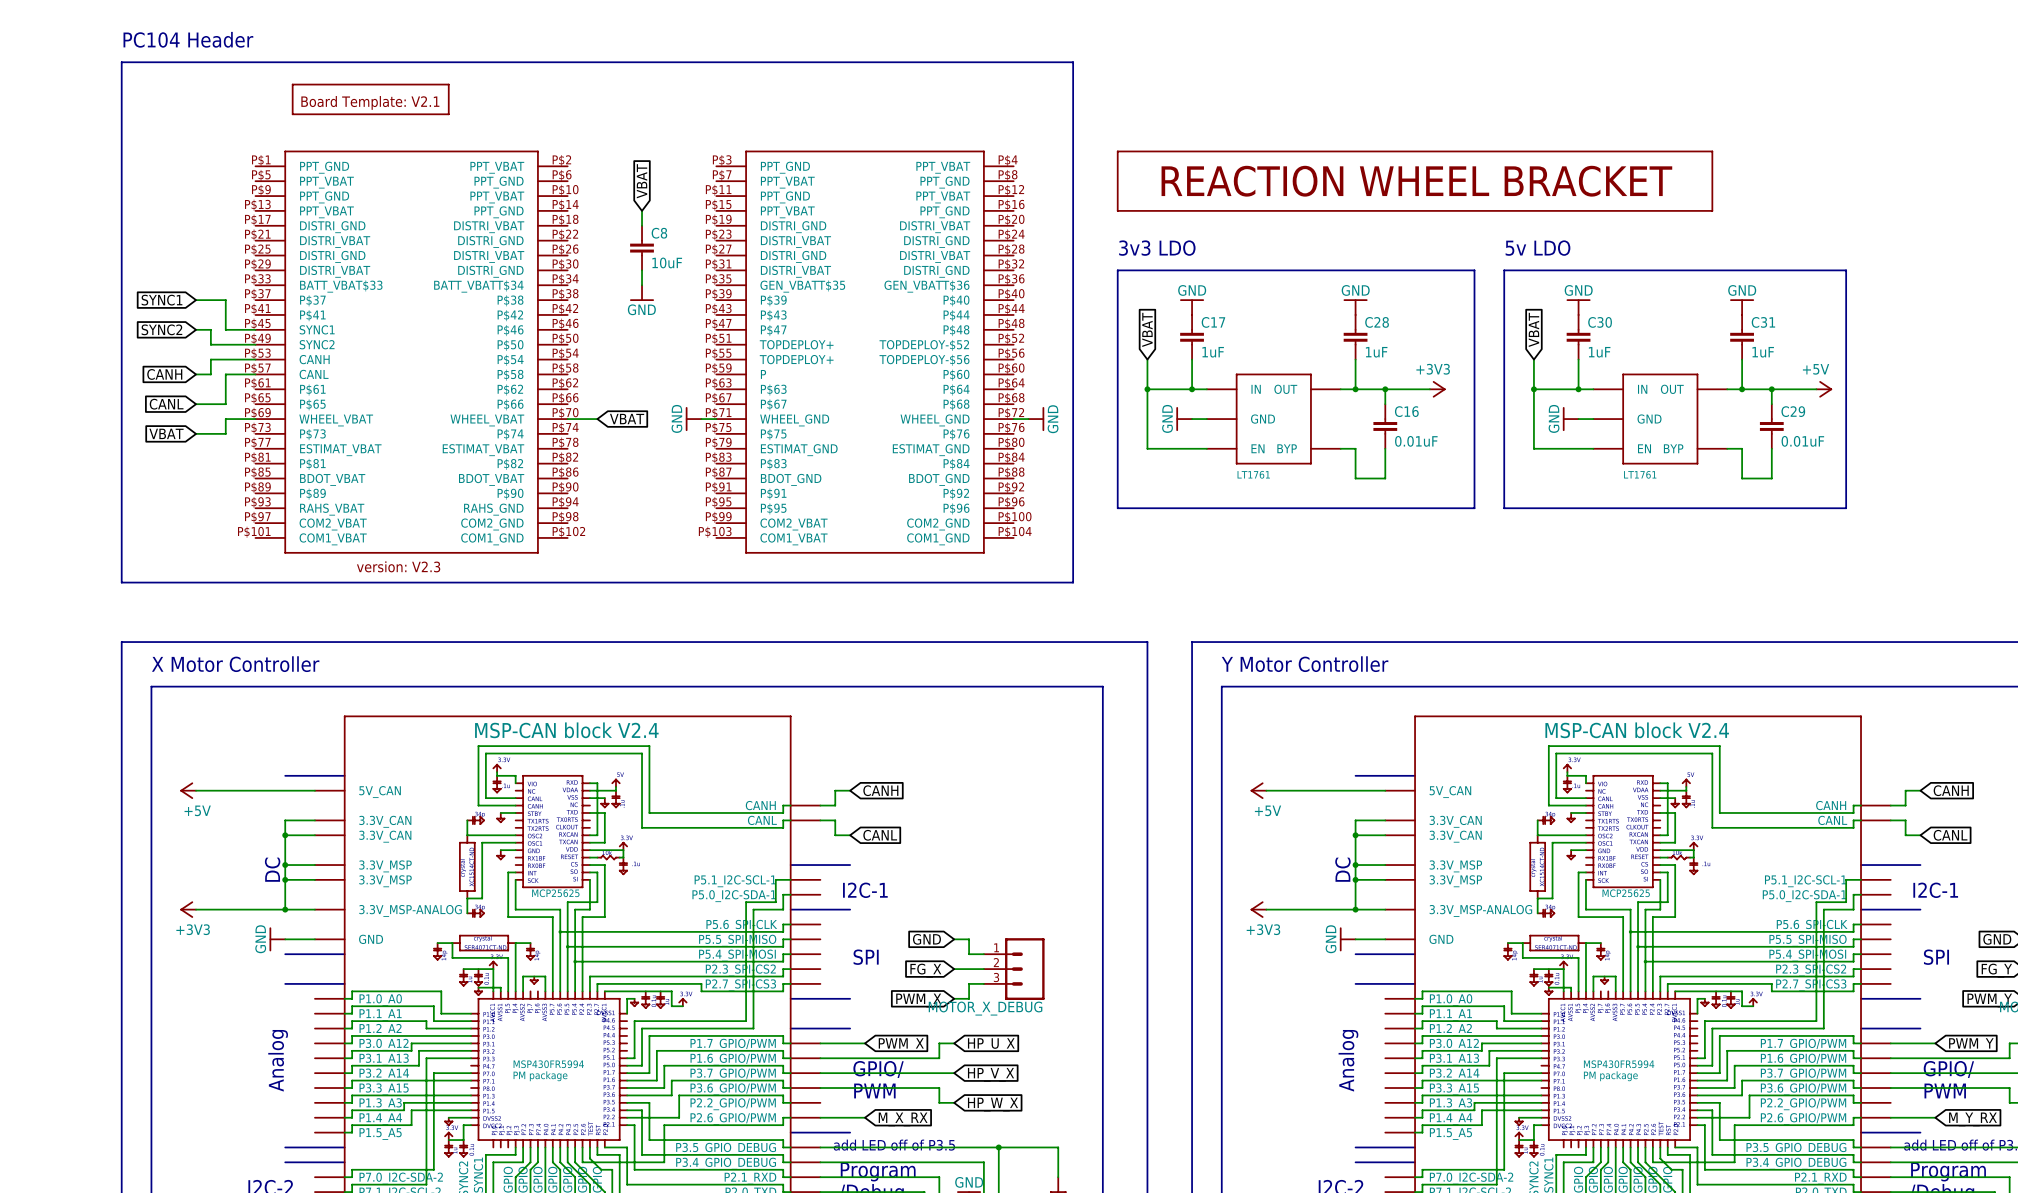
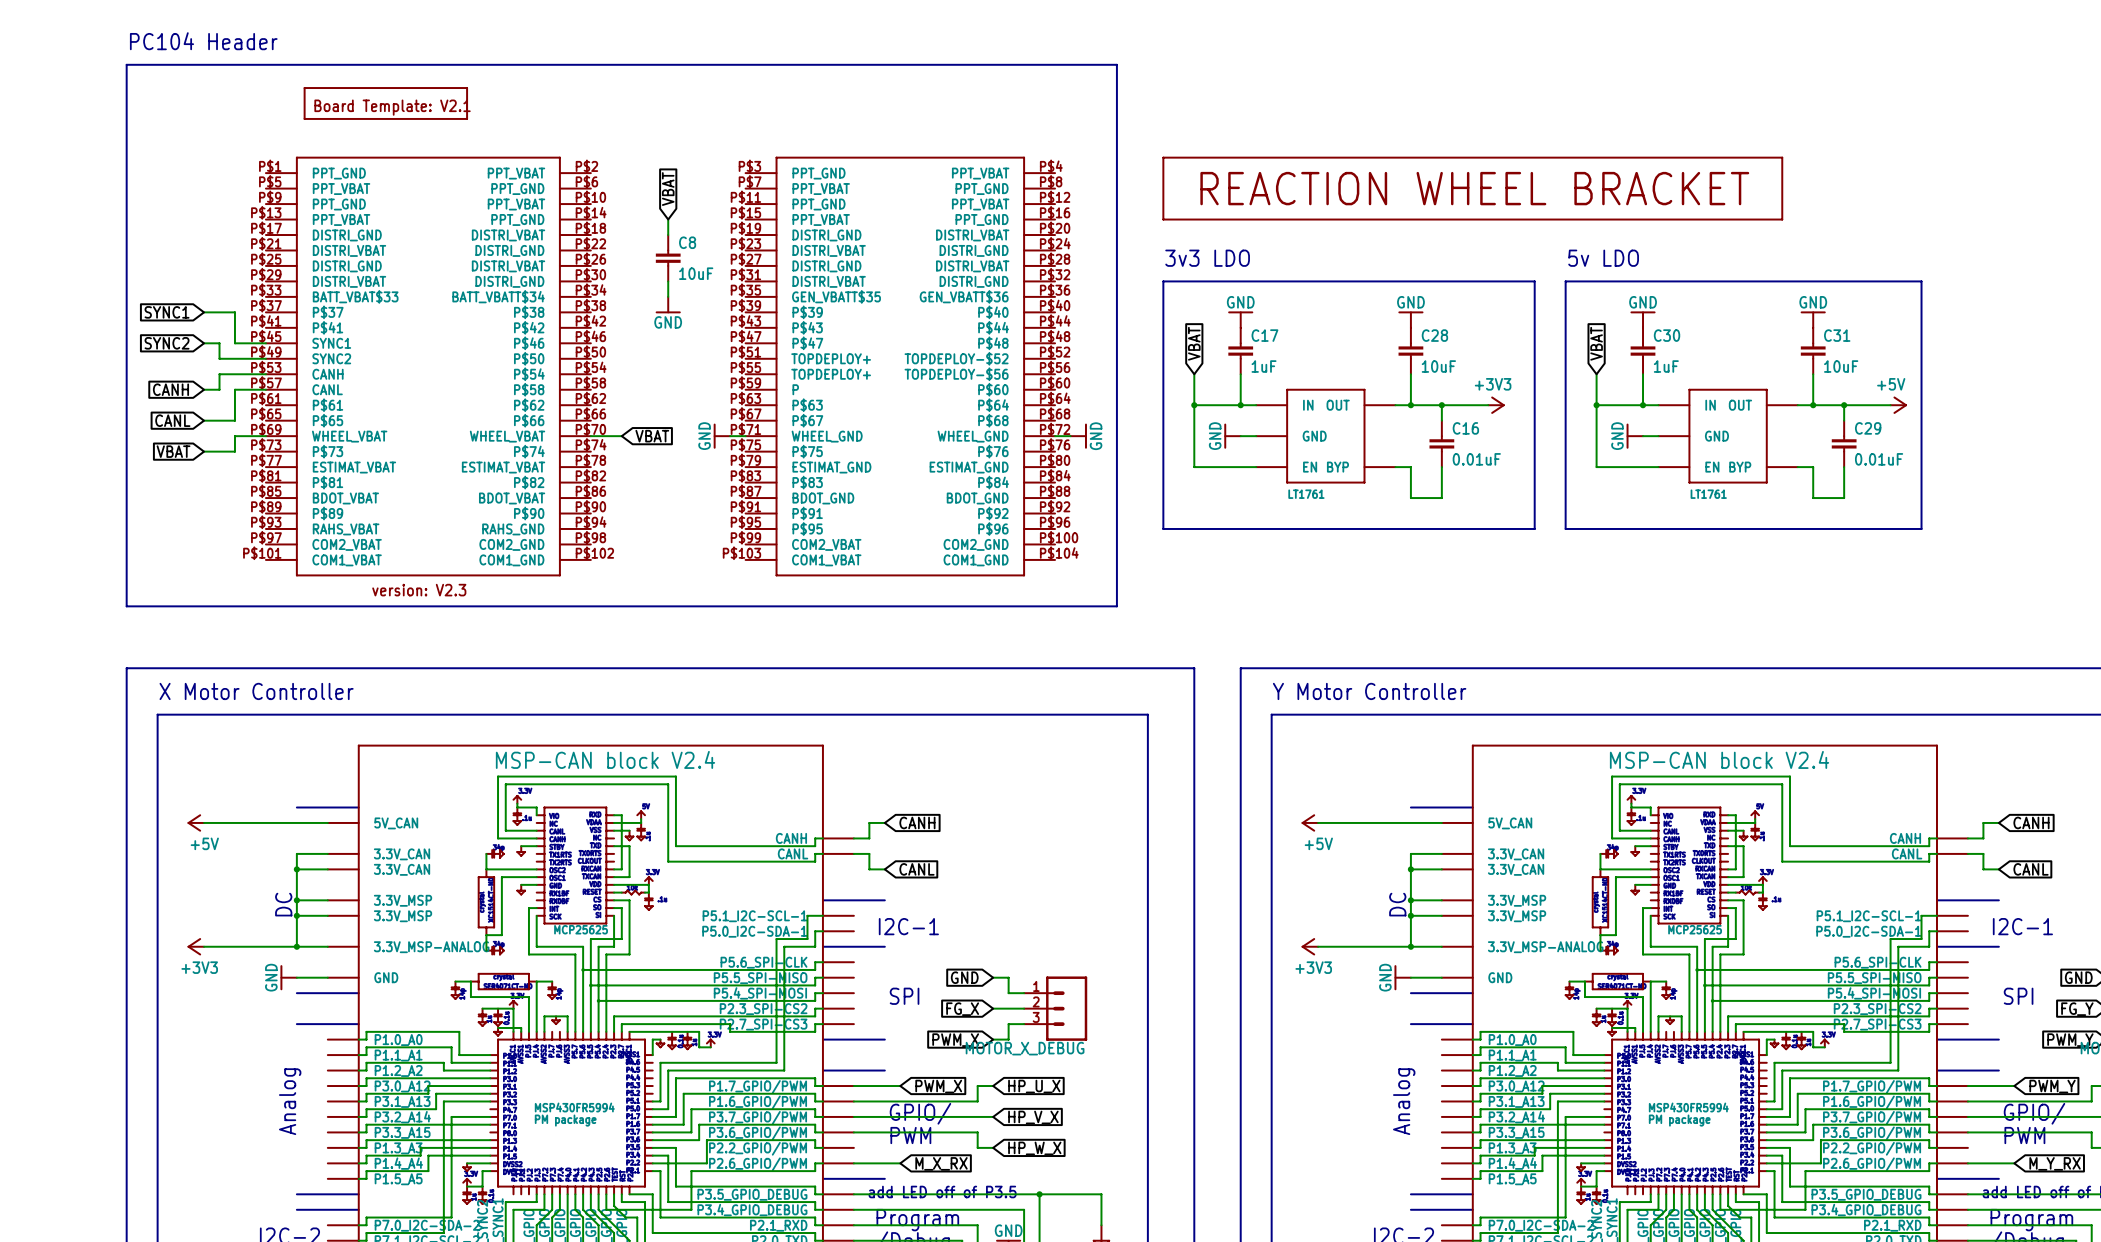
C28 value: 1uF (1376, 352) -> 10uF (1438, 366)
C31 value: 1uF (1763, 352) -> 10uF (1841, 366)

